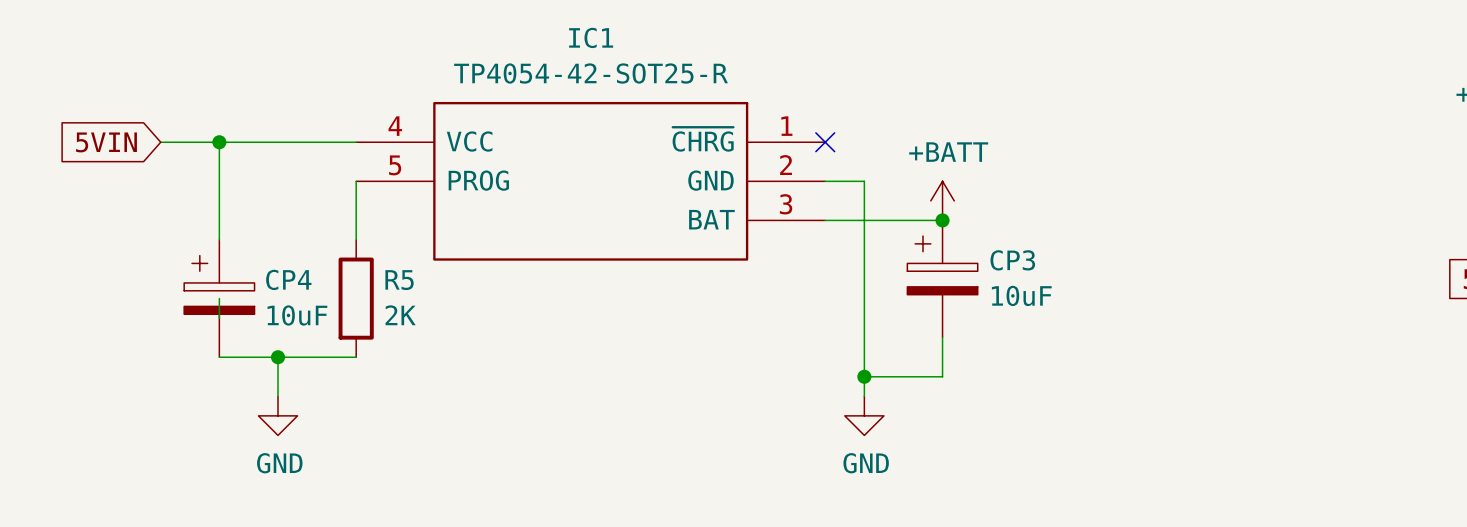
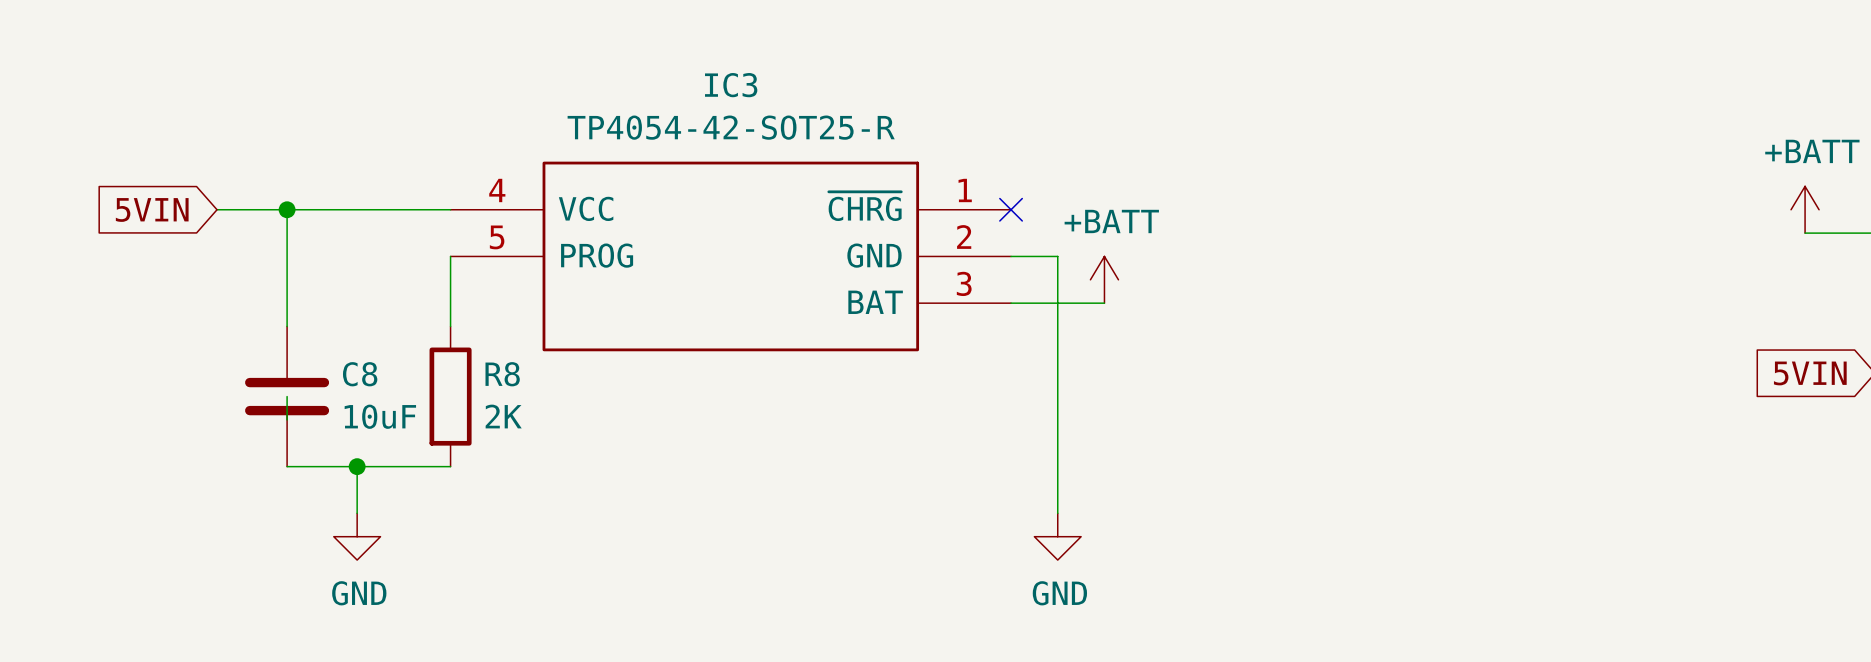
IC1 name: IC1 (591, 37) -> IC3 (731, 85)
power symbol position: +BATT (942, 200) -> +BATT (1104, 279)
wire: (903, 220) (942, 220) -> none
junction: (942, 220) -> none
CP3: 10uF (942, 279) -> none
R5 name: R5 (399, 280) -> R8 (502, 374)
CP4: 10uF (219, 298) -> none
C8: none -> 10uF (287, 396)
wire: (942, 337) (942, 376) (864, 376) -> none
junction: (864, 376) -> none

